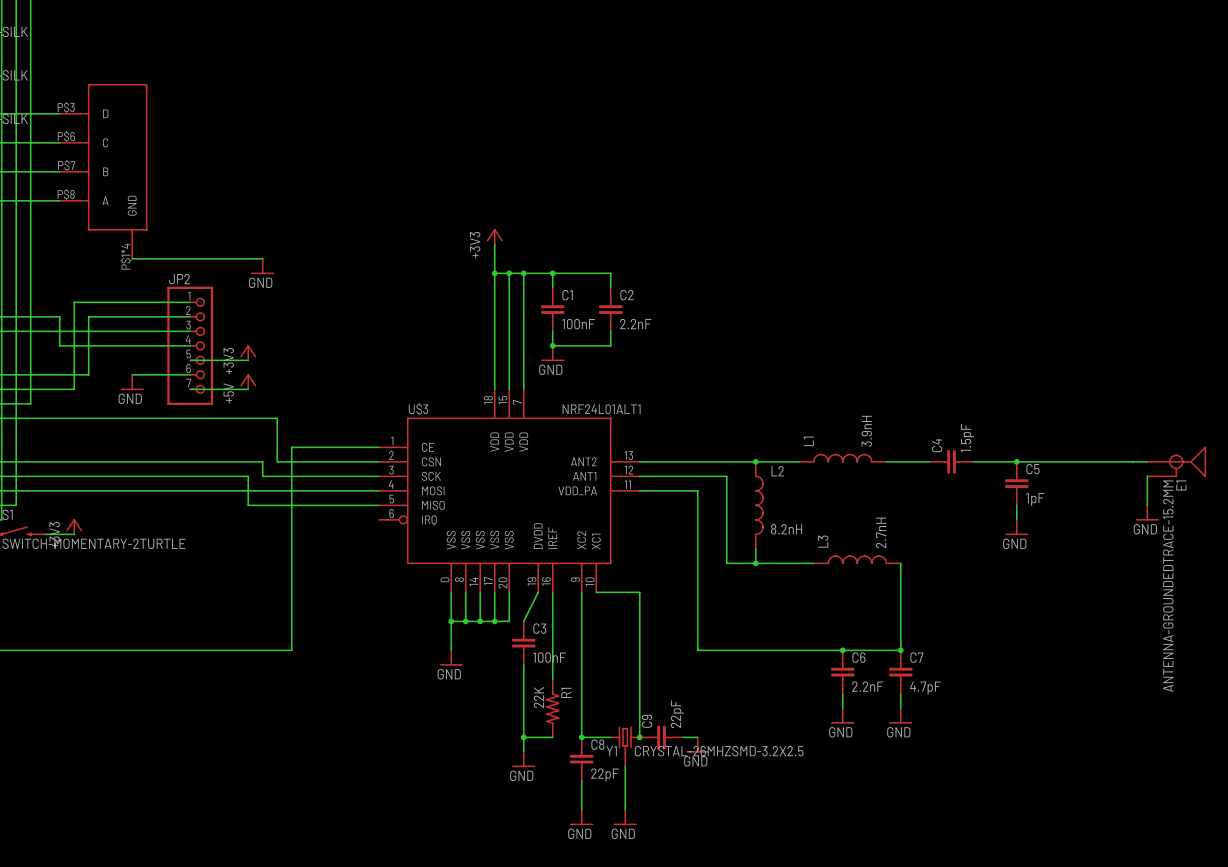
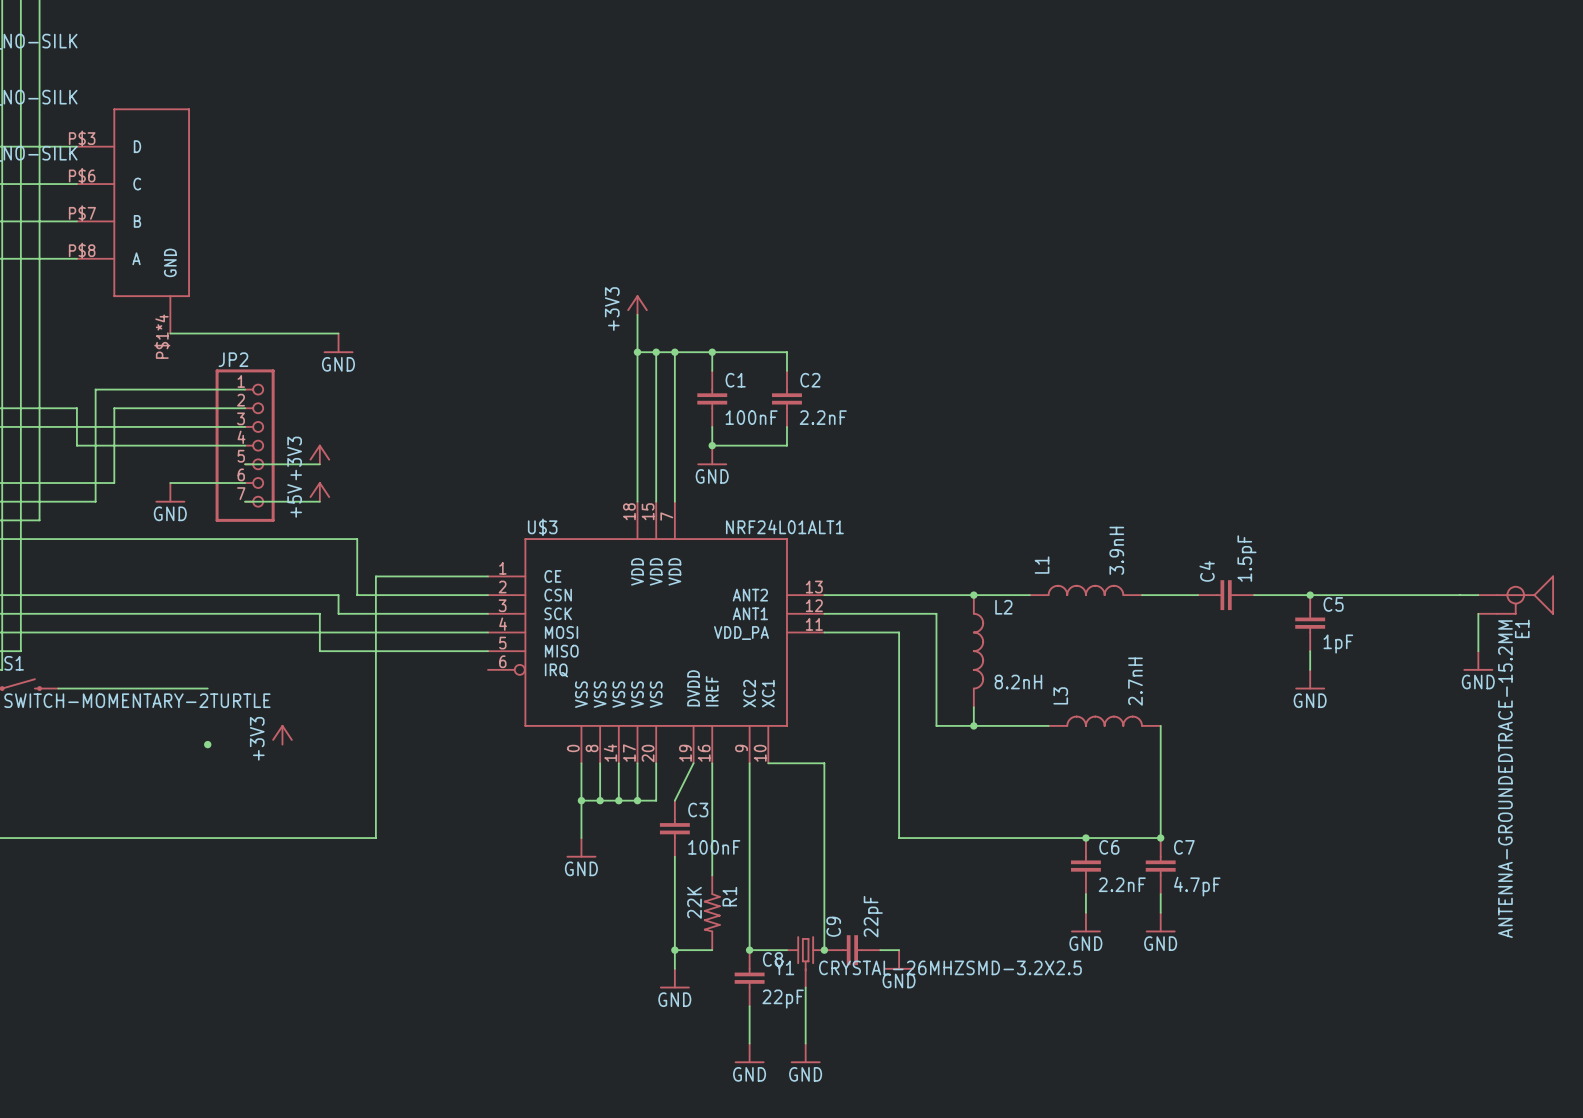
power symbol: +3V3 (74, 526) -> none
wire: none -> (95, 688) (207, 688)
power symbol: none -> +3V3 (282, 734)
junction: none -> (207, 744)

